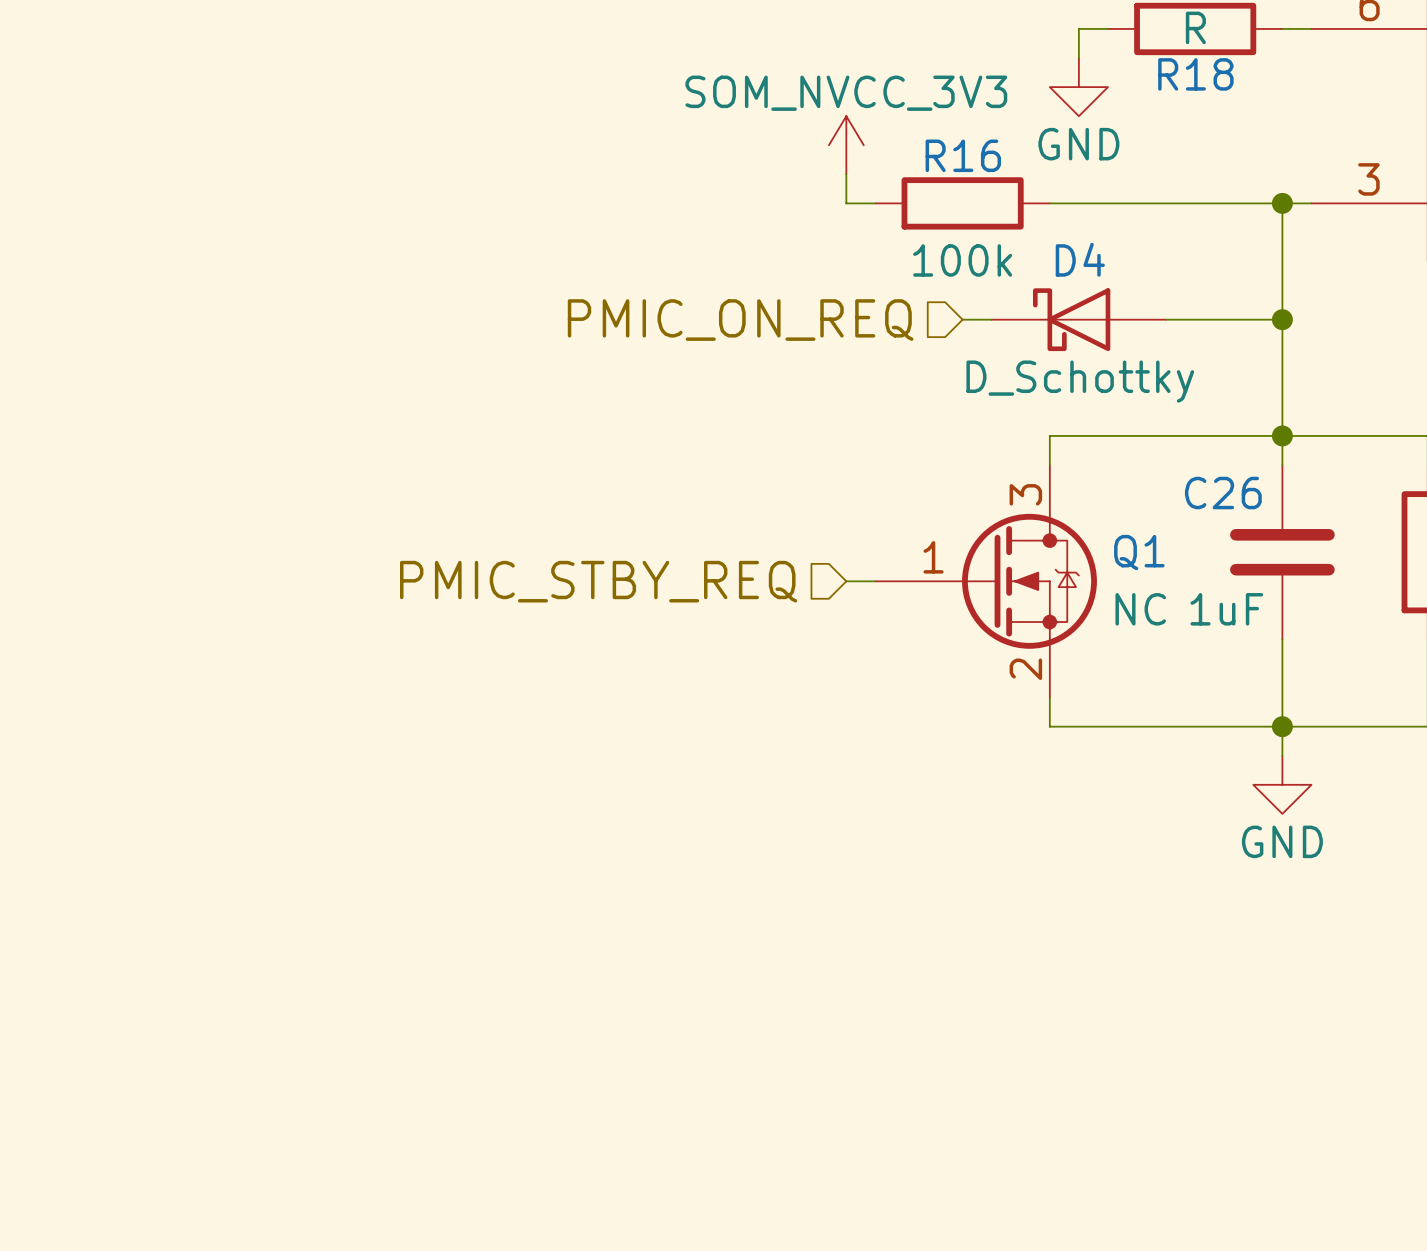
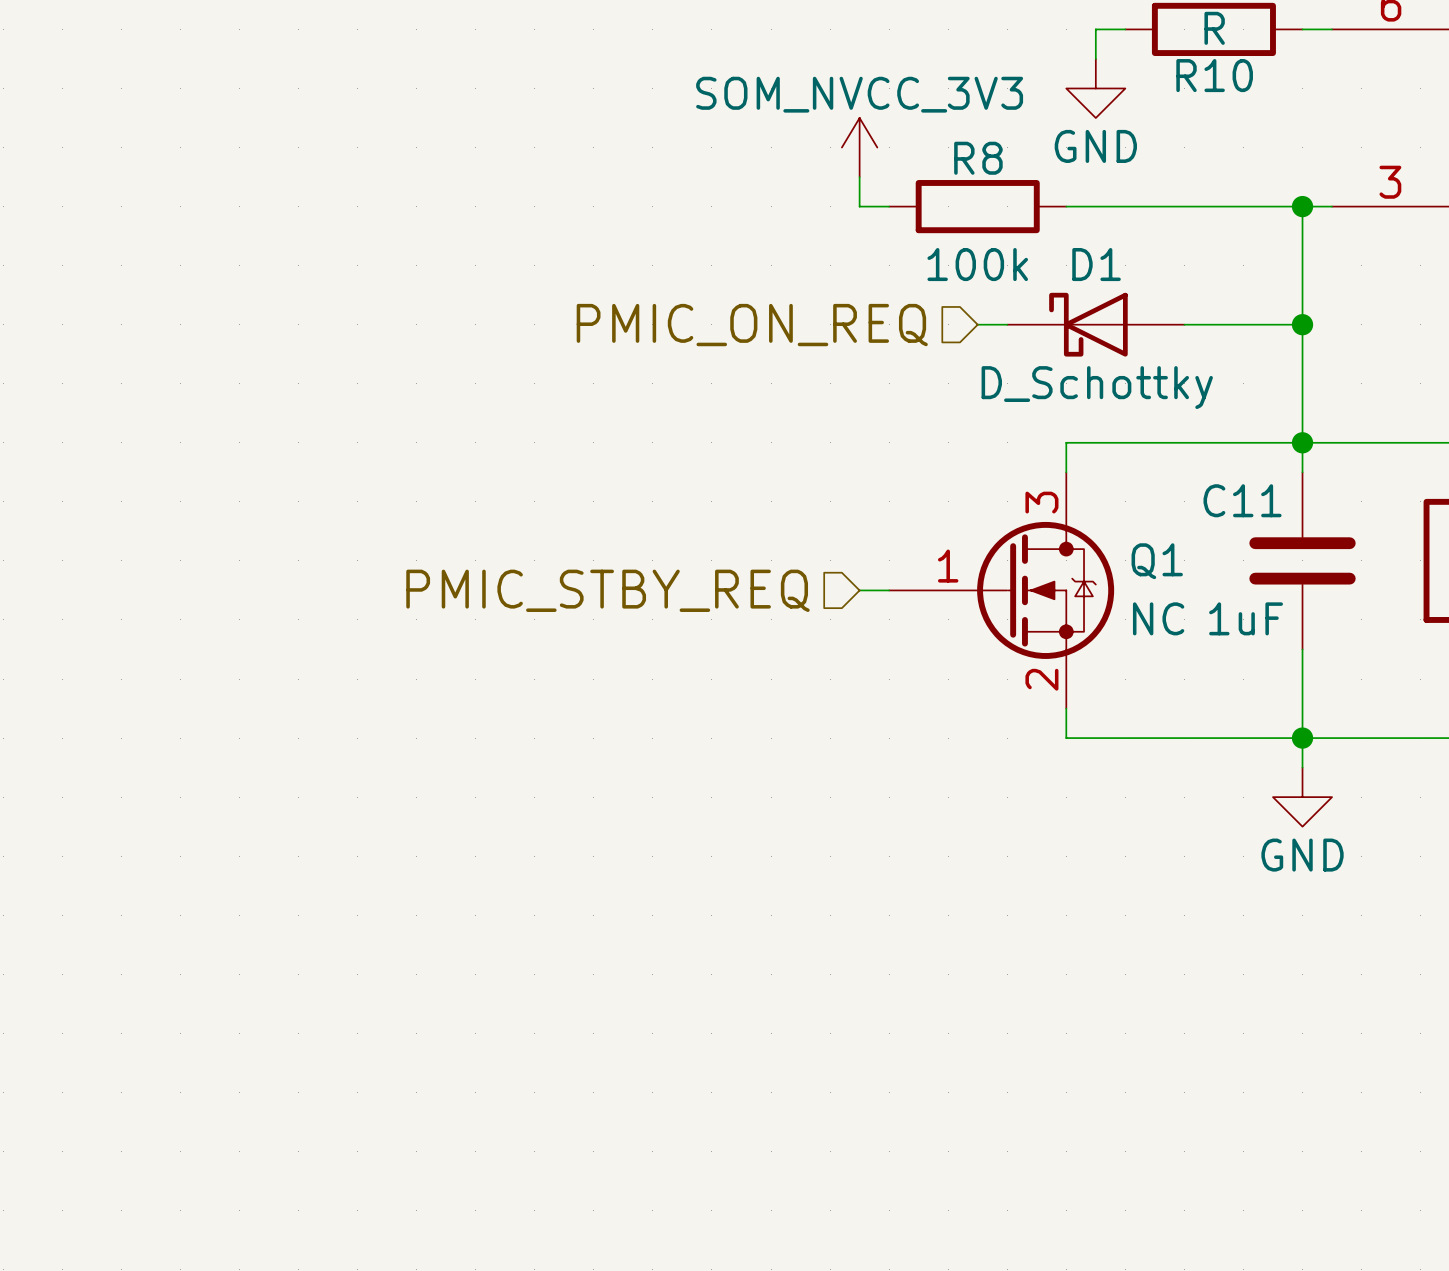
R18 name: R18 (1195, 74) -> R10 (1214, 75)
R16 name: R16 (963, 155) -> R8 (978, 158)
D4 name: D4 (1080, 259) -> D1 (1096, 264)
C26 name: C26 (1223, 493) -> C11 (1242, 500)

